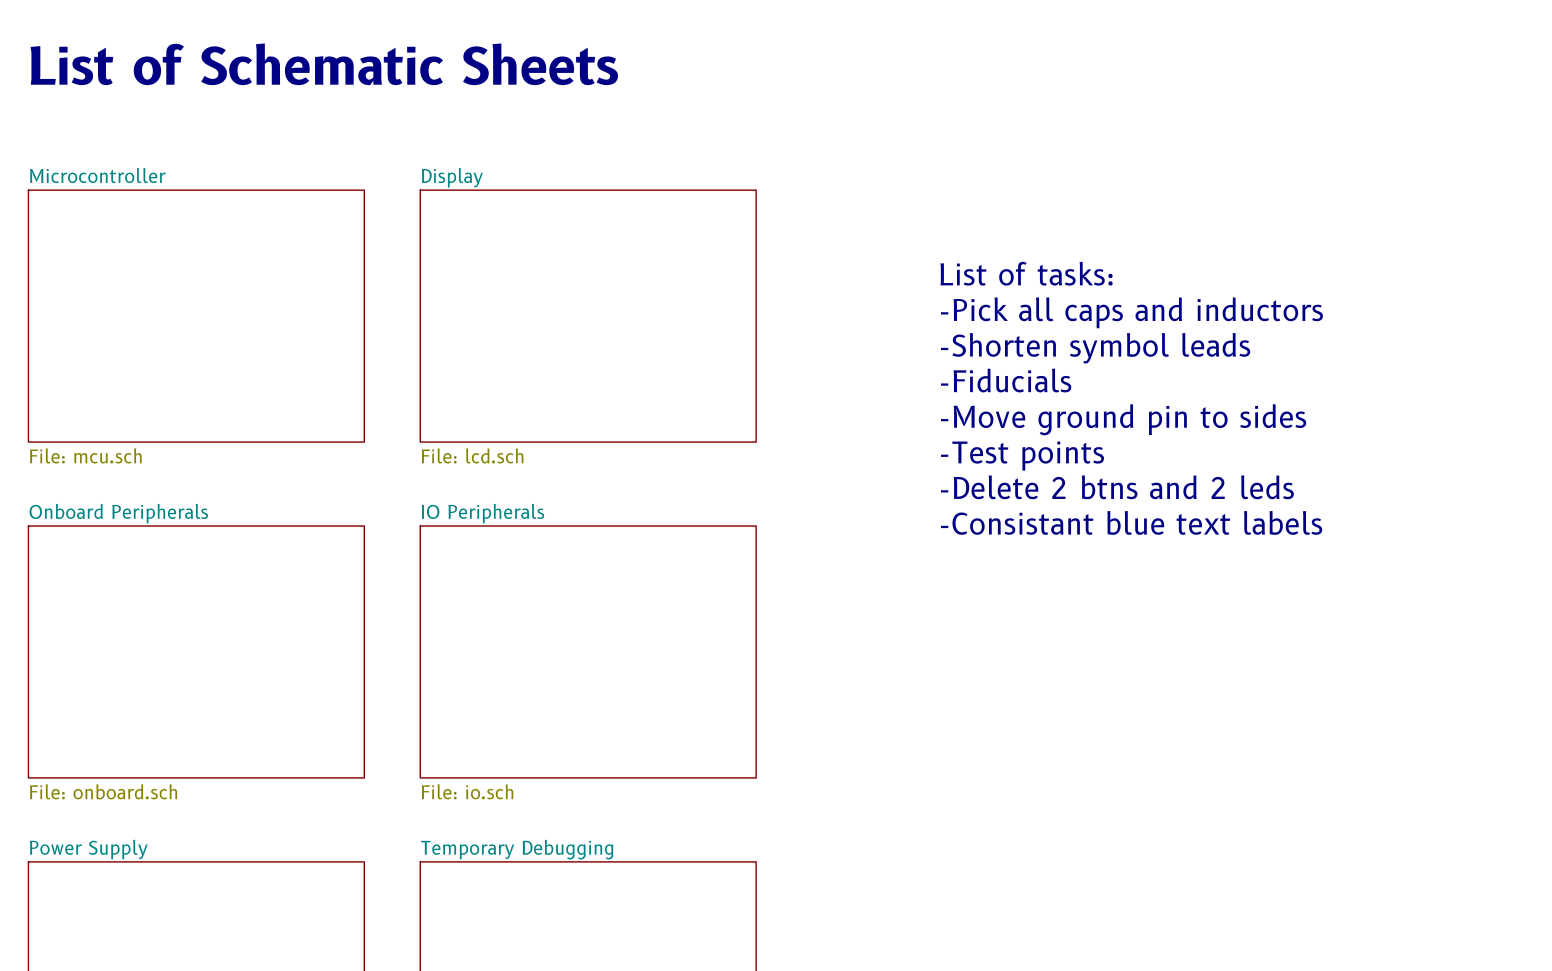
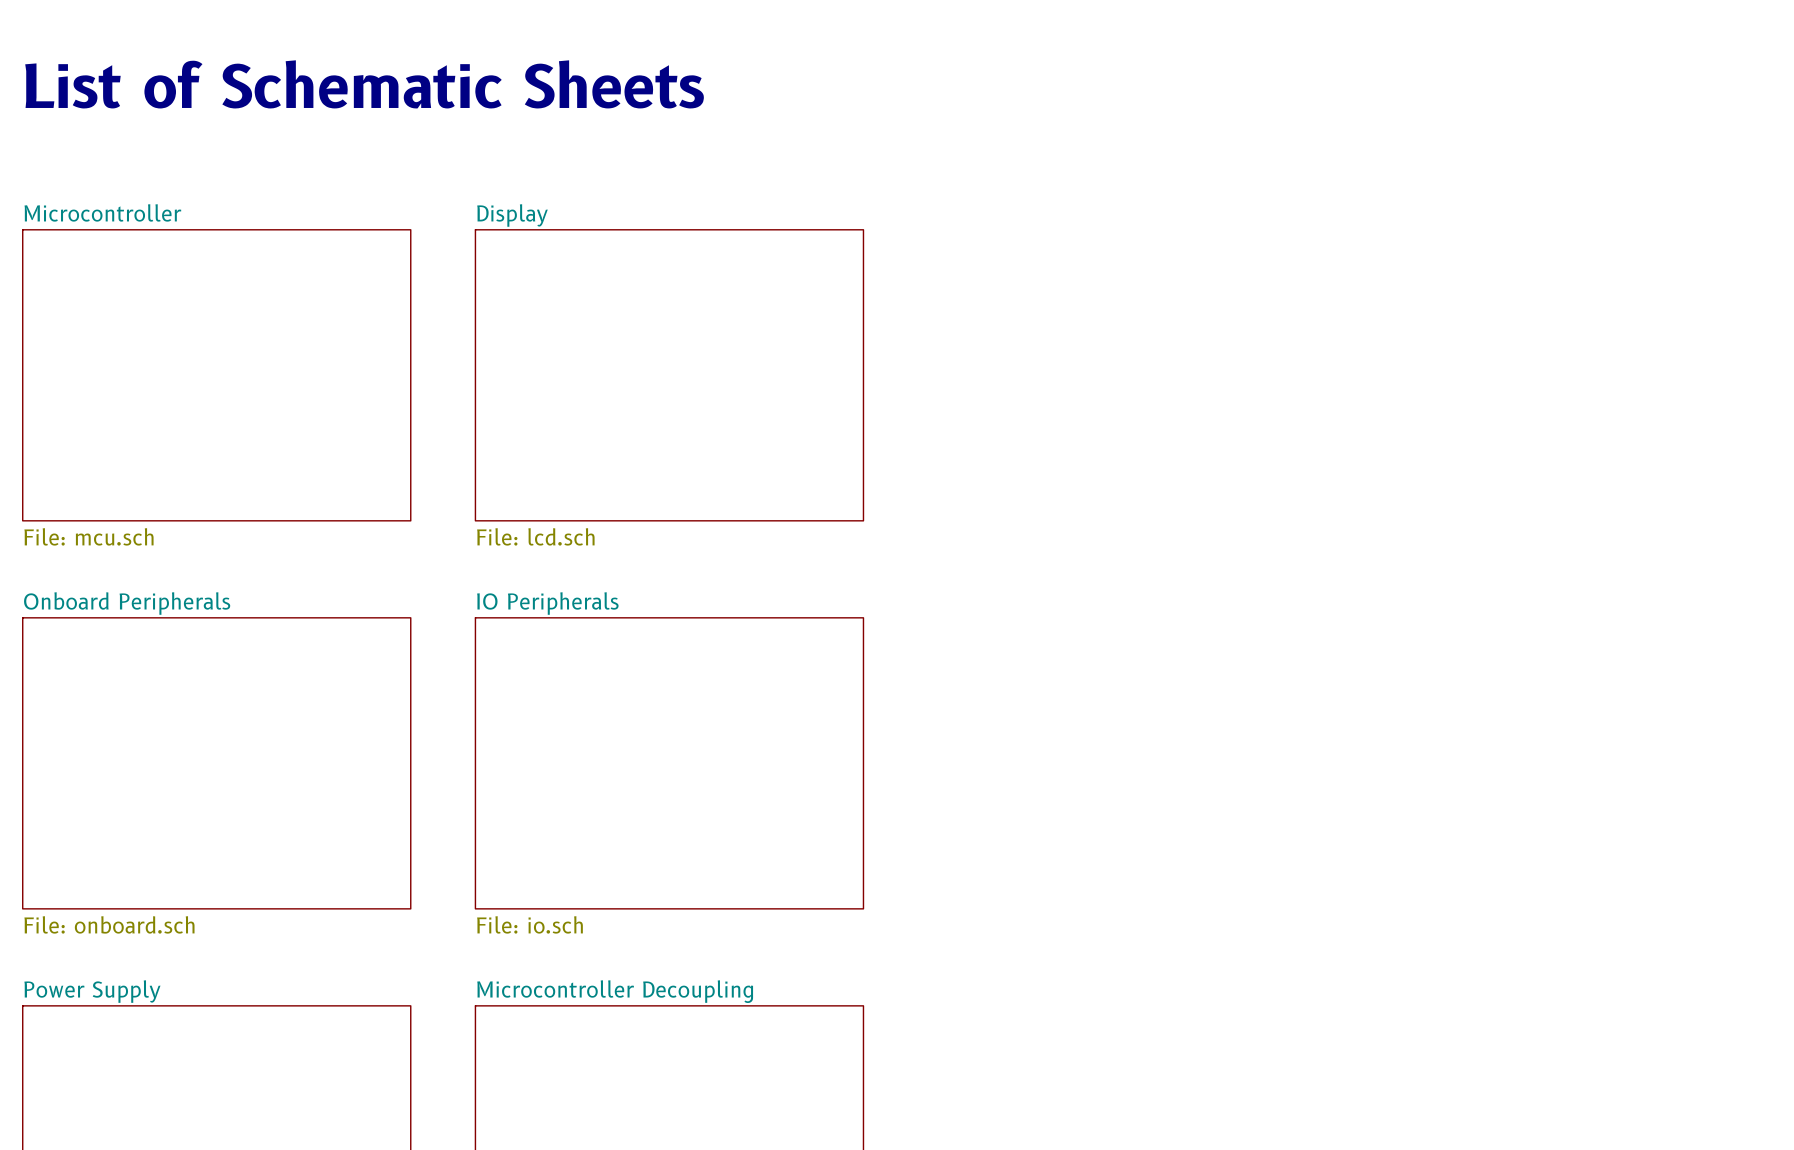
text: List of tasks: (1026, 273) -> none
text: -Pick all caps and inductors (1131, 312) -> none
text: -Shorten symbol leads (1095, 348) -> none
text: -Fiducials (1006, 380) -> none
text: -Move ground pin to sides (1123, 419) -> none
text: -Test points (1022, 456) -> none
text: -Delete 2 btns and 2 leds (1117, 487) -> none
text: -Consistant blue text labels (1131, 522) -> none
sheet Temporary Debugging name: Temporary Debugging (517, 849) -> Microcontroller Decoupling (615, 991)

